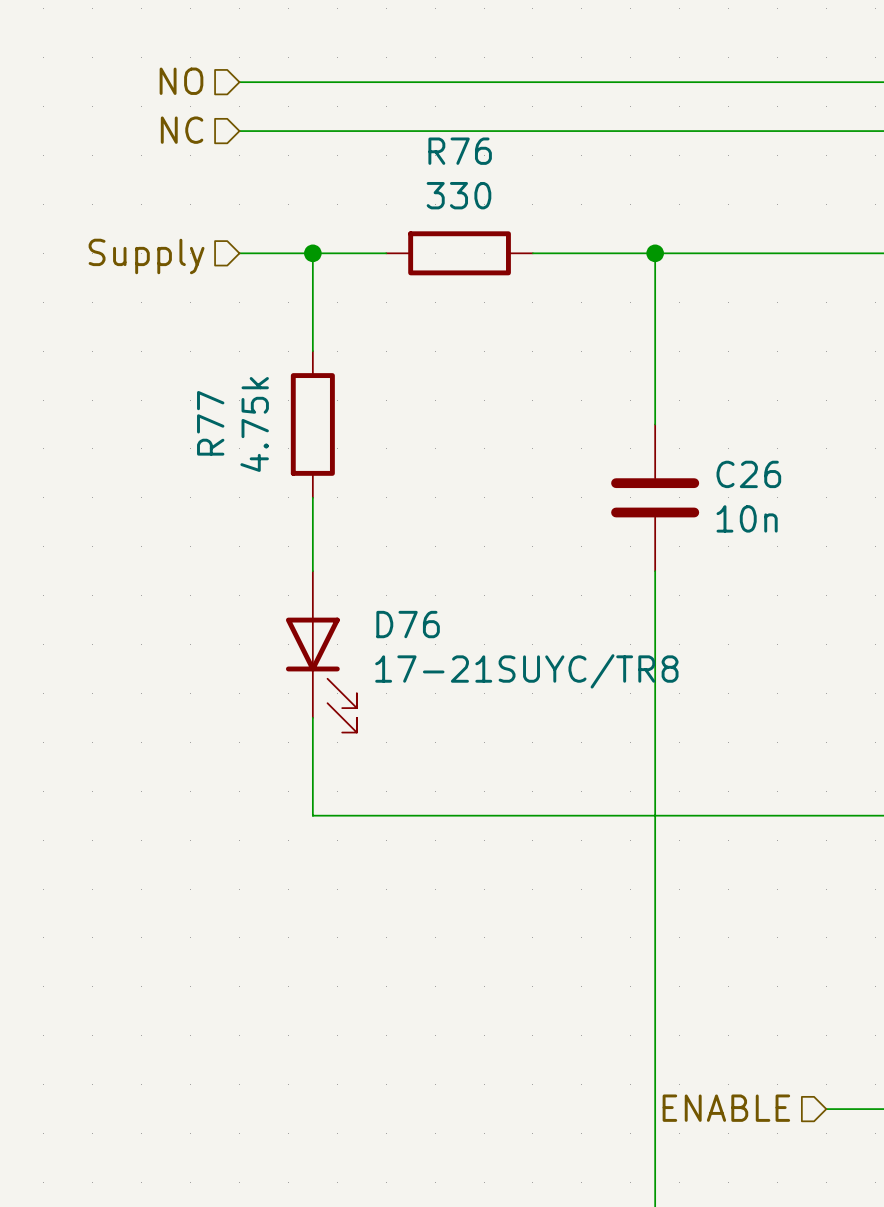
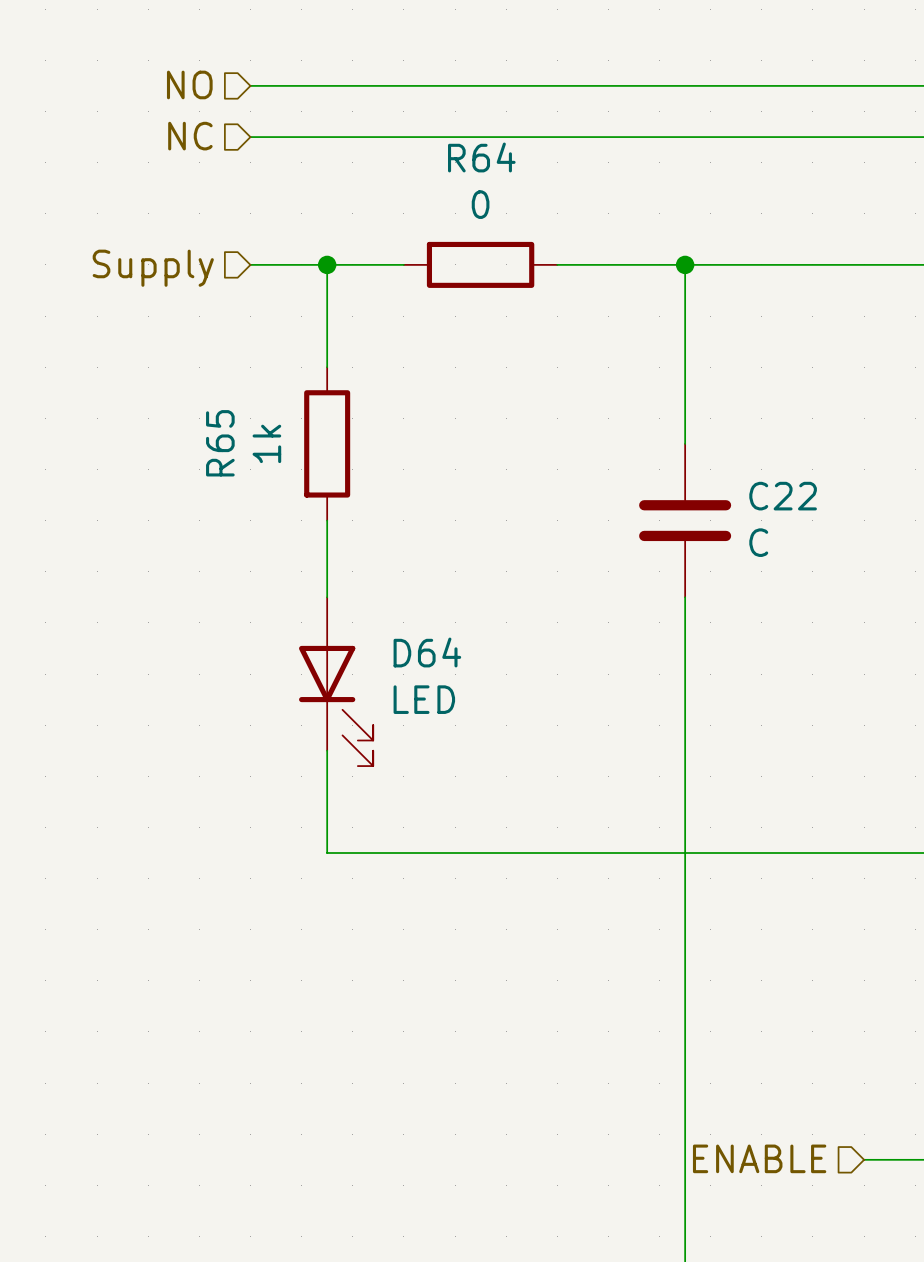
R76 name: R76 (460, 151) -> R64 (481, 157)
R76 value: 330 (458, 195) -> 0 (480, 204)
R77 name: R77 (210, 423) -> R65 (220, 443)
R77 value: 4.75k (254, 424) -> 1k (266, 443)
C26 name: C26 (748, 474) -> C22 (783, 496)
C26 value: 10n (747, 518) -> C (758, 542)
D76 name: D76 (408, 624) -> D64 (427, 652)
D76 value: 17-21SUYC/TR8 (526, 671) -> LED (424, 699)

